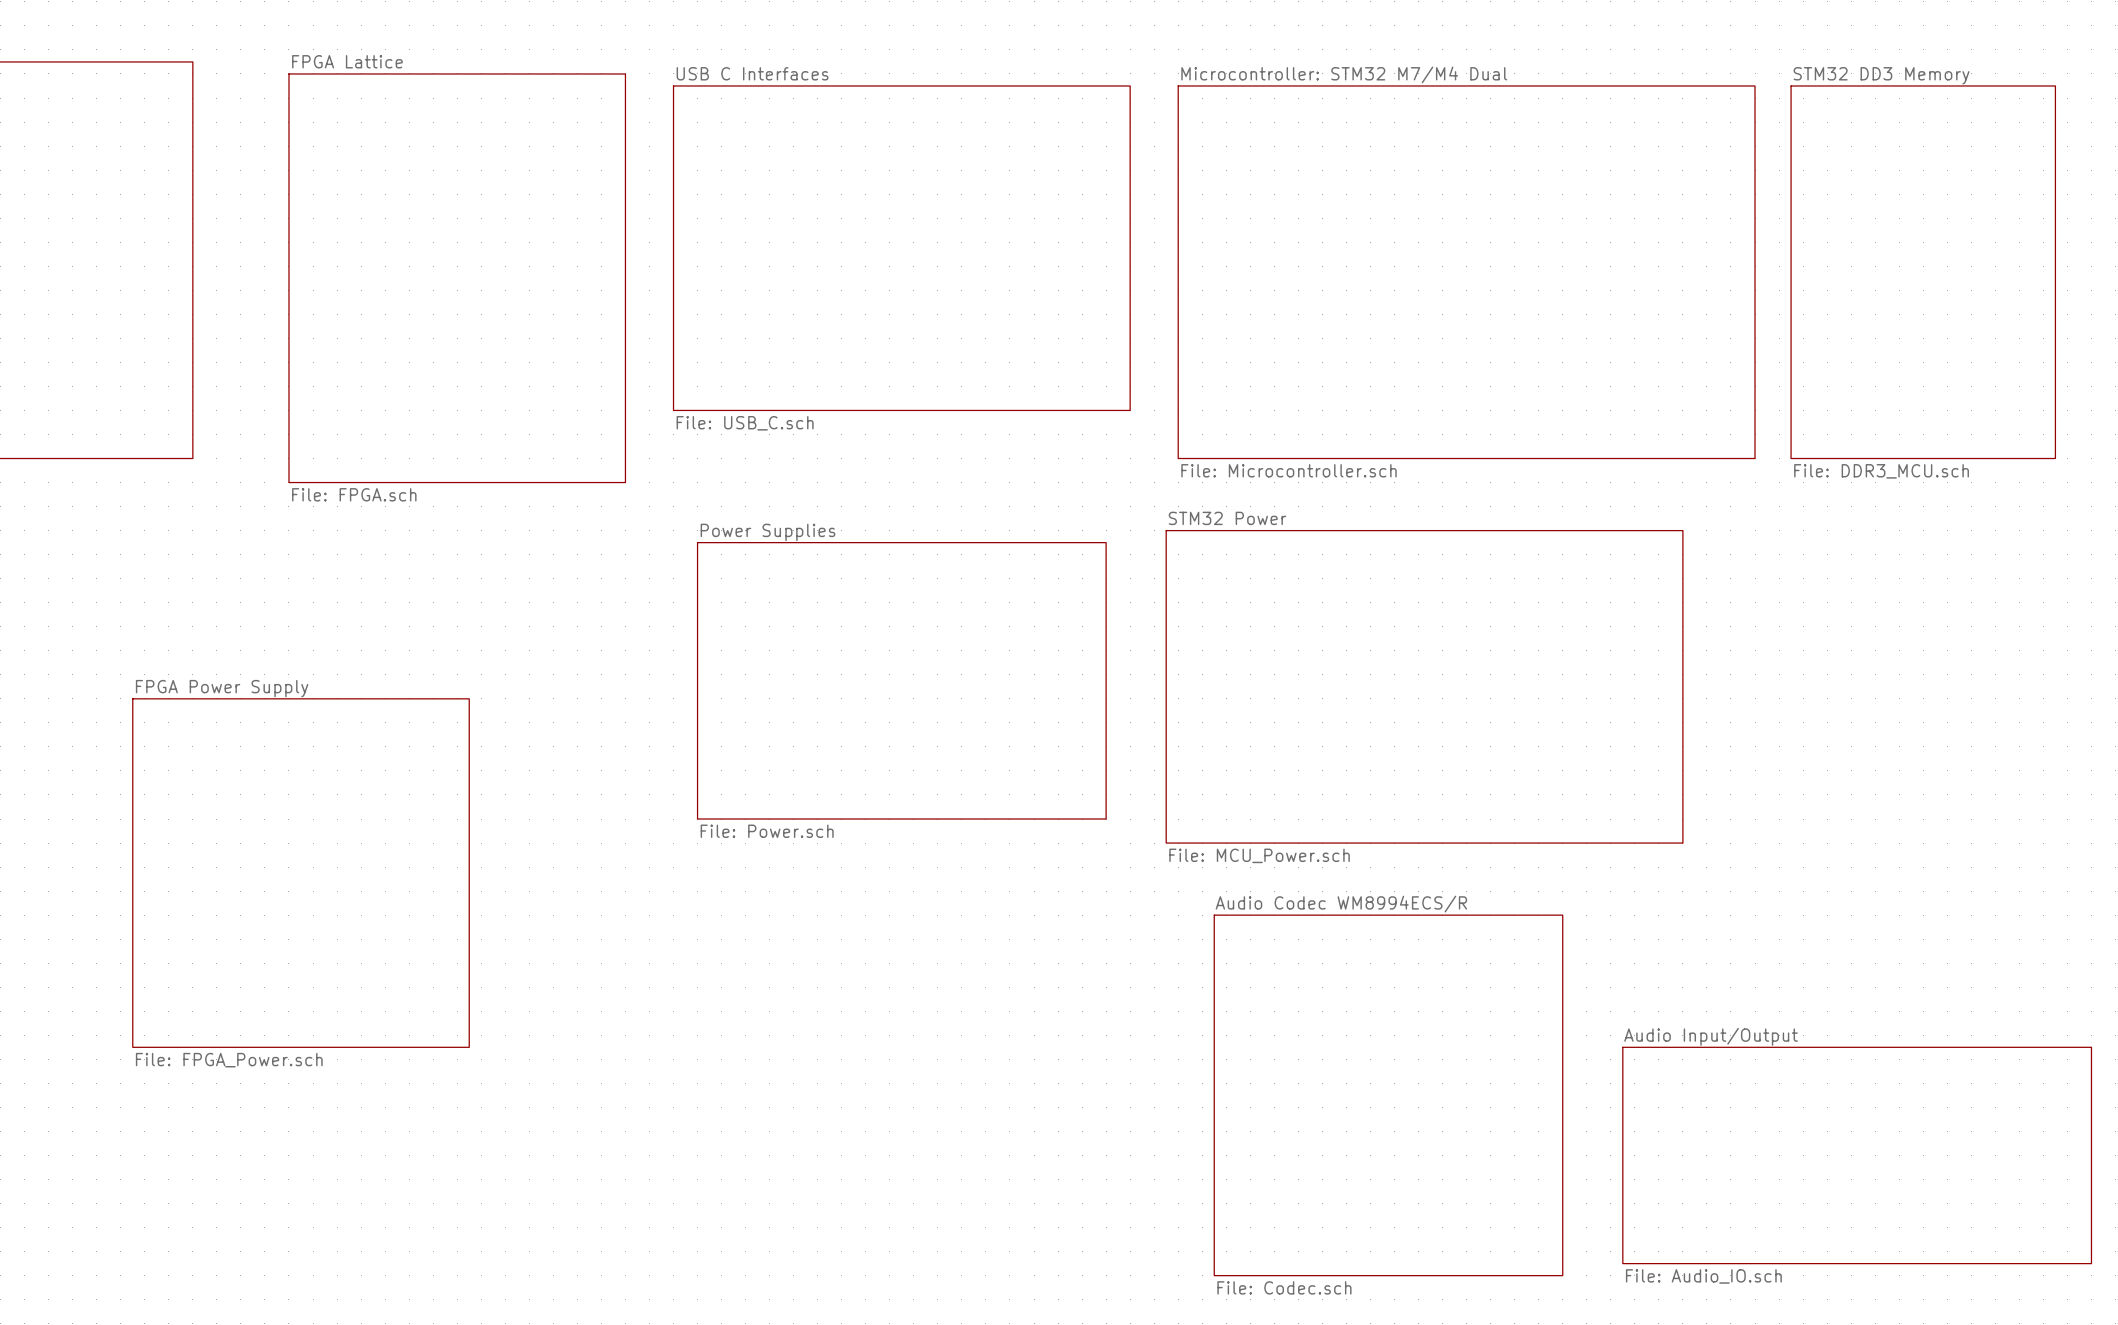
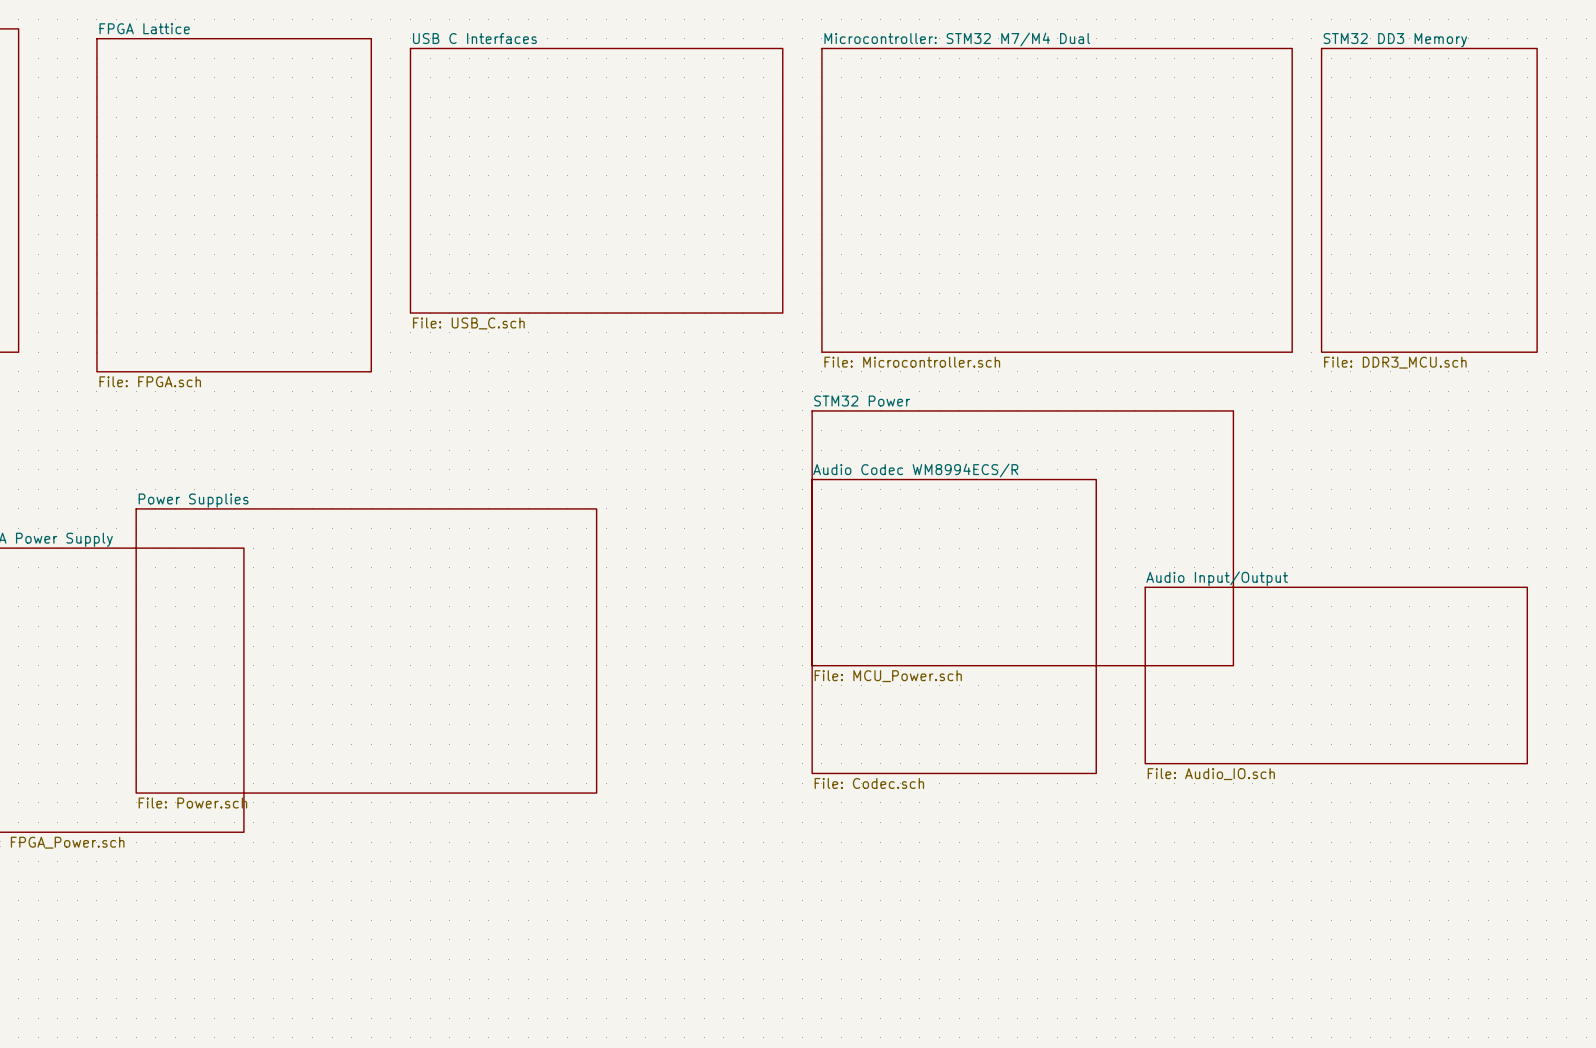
sheet Power Supplies: File: Power.sch (901, 680) -> none
sheet Power Supplies: none -> File: Power.sch (366, 650)
sheet Audio Input/Output: none -> File: Audio_IO.sch (1336, 675)
sheet Audio Codec WM8994ECS/R position: (1388, 1095) -> (954, 626)
sheet Audio Input/Output: File: Audio_IO.sch (1857, 1155) -> none

